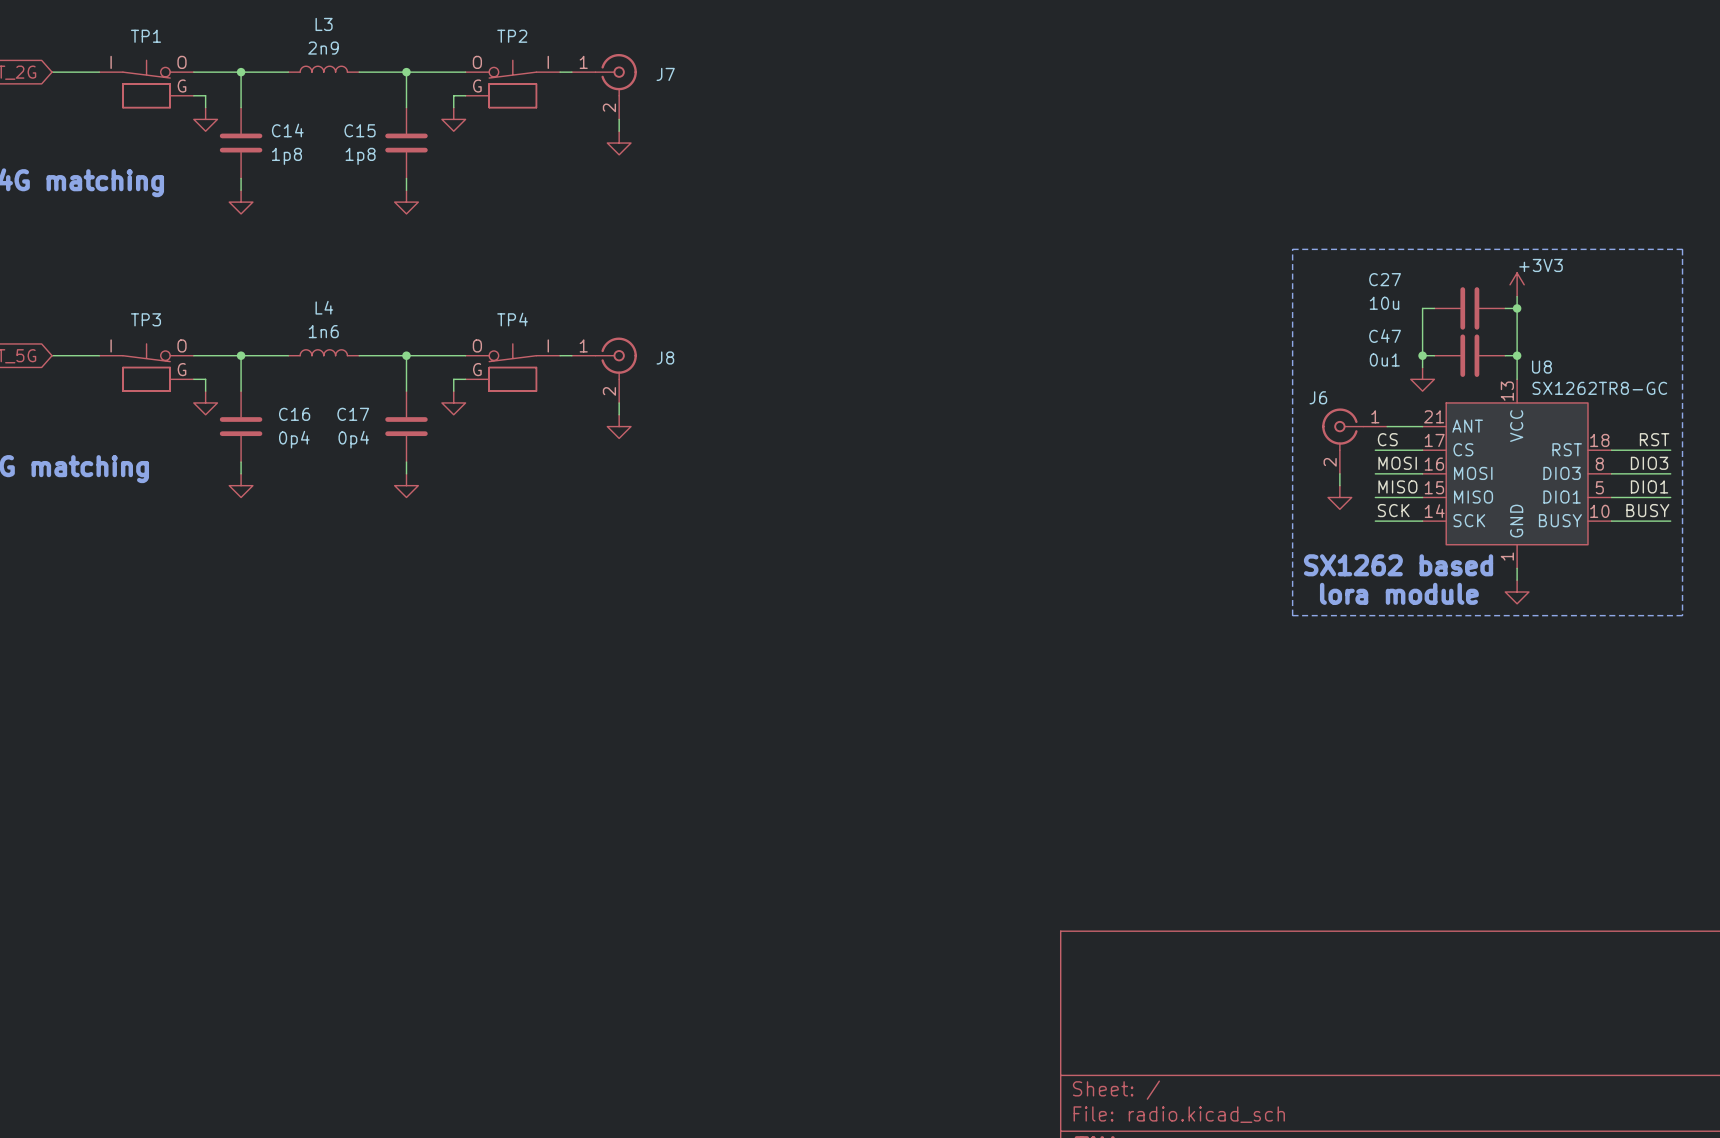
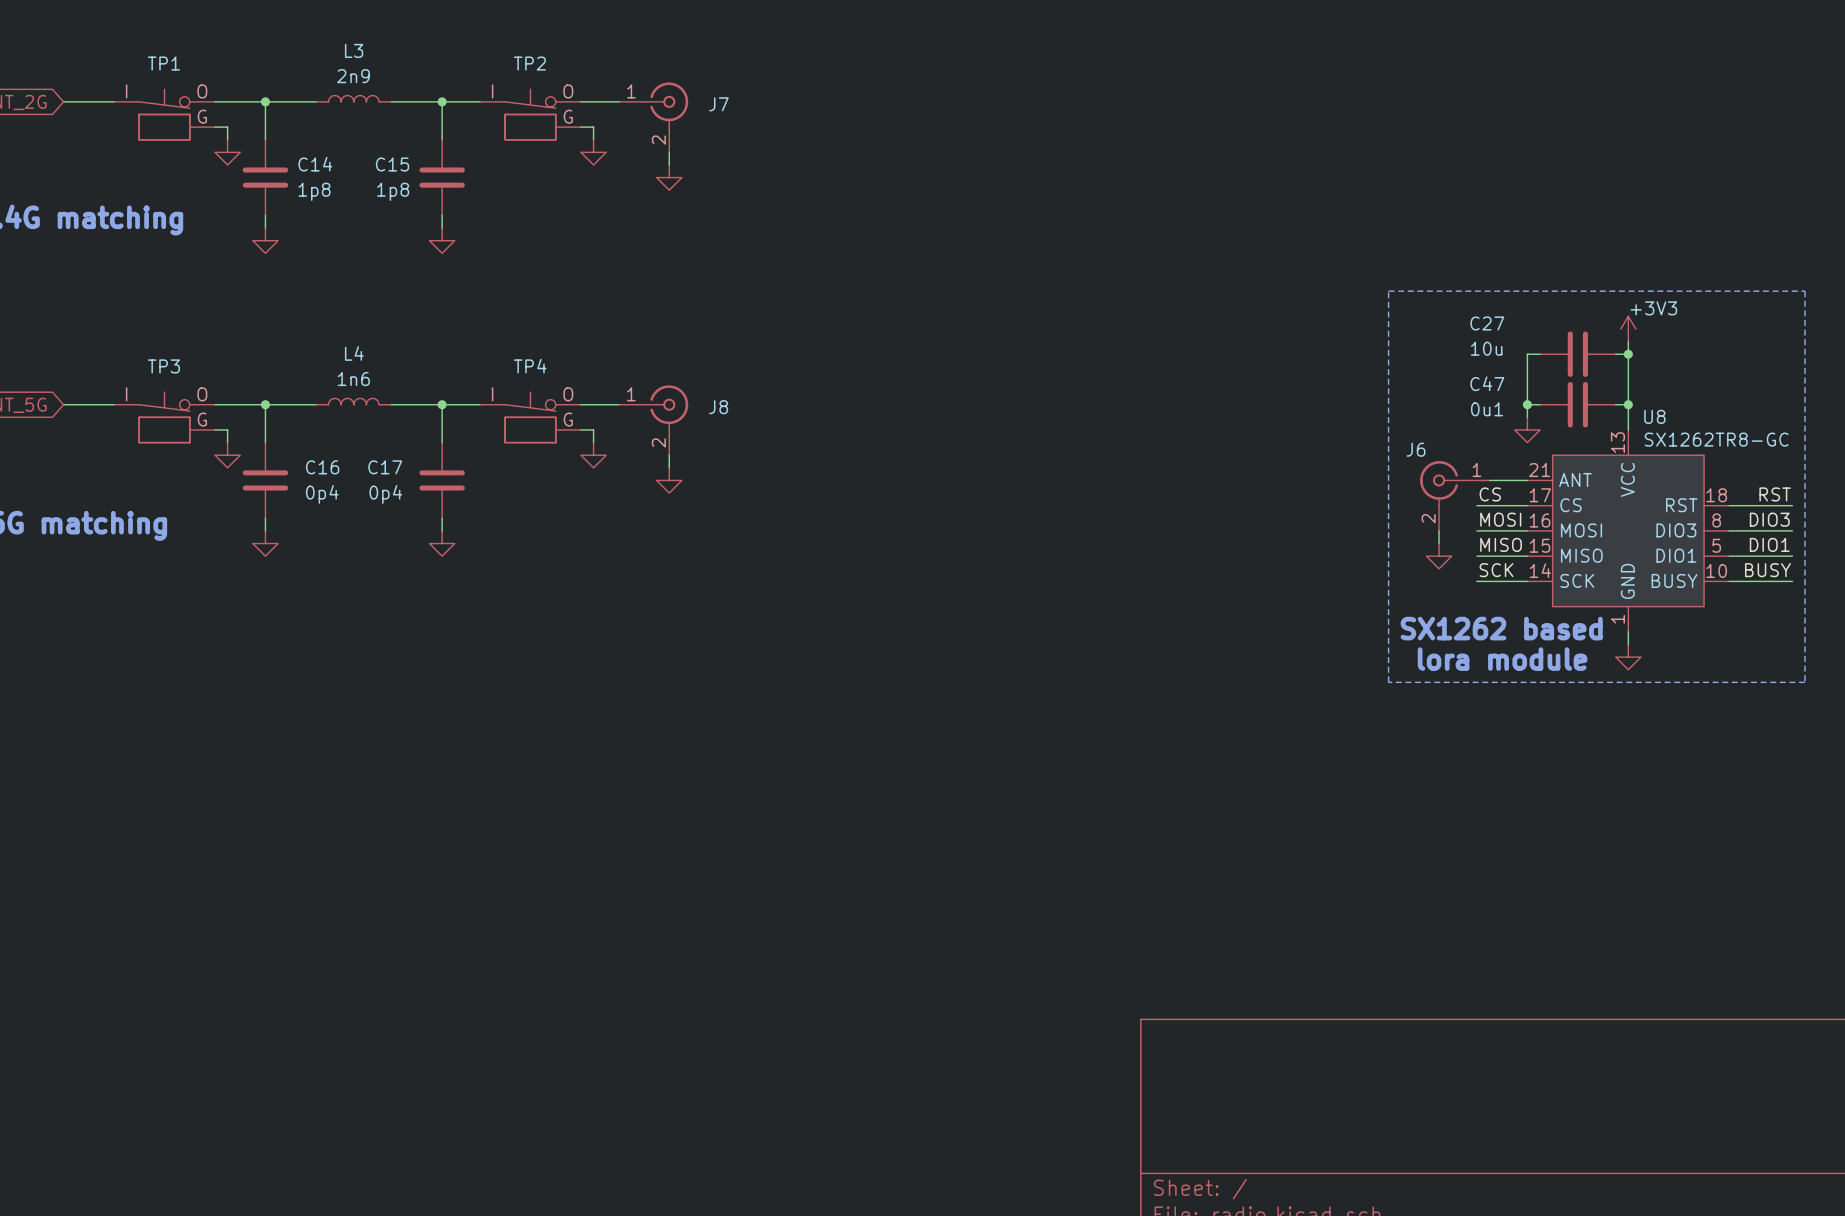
TP2 flip: as is (512, 83) -> left-right (530, 114)
wire: (465, 95) (453, 95) (453, 107) -> none
wire: none -> (580, 127) (593, 127) (593, 139)
power symbol position: (453, 119) -> (593, 152)
TP4 flip: as is (512, 367) -> left-right (530, 417)
wire: (465, 379) (453, 379) (453, 391) -> none
wire: none -> (580, 429) (593, 429) (593, 442)
power symbol position: (453, 402) -> (593, 455)

